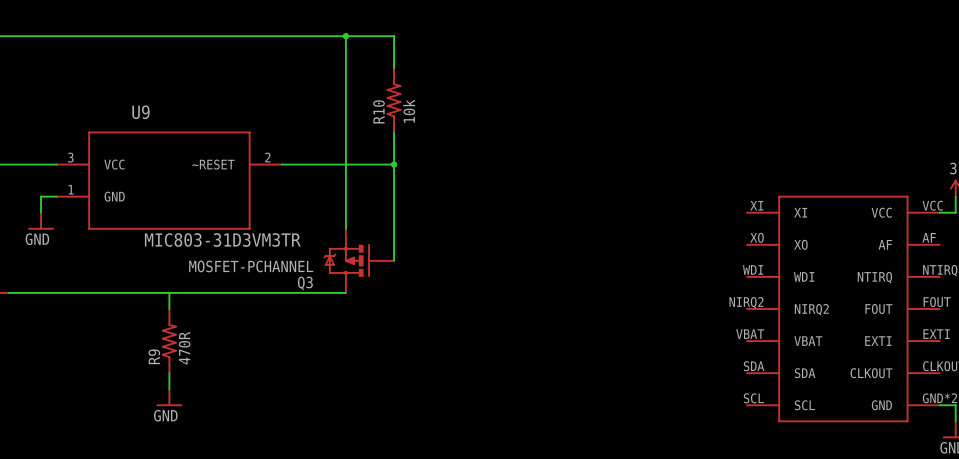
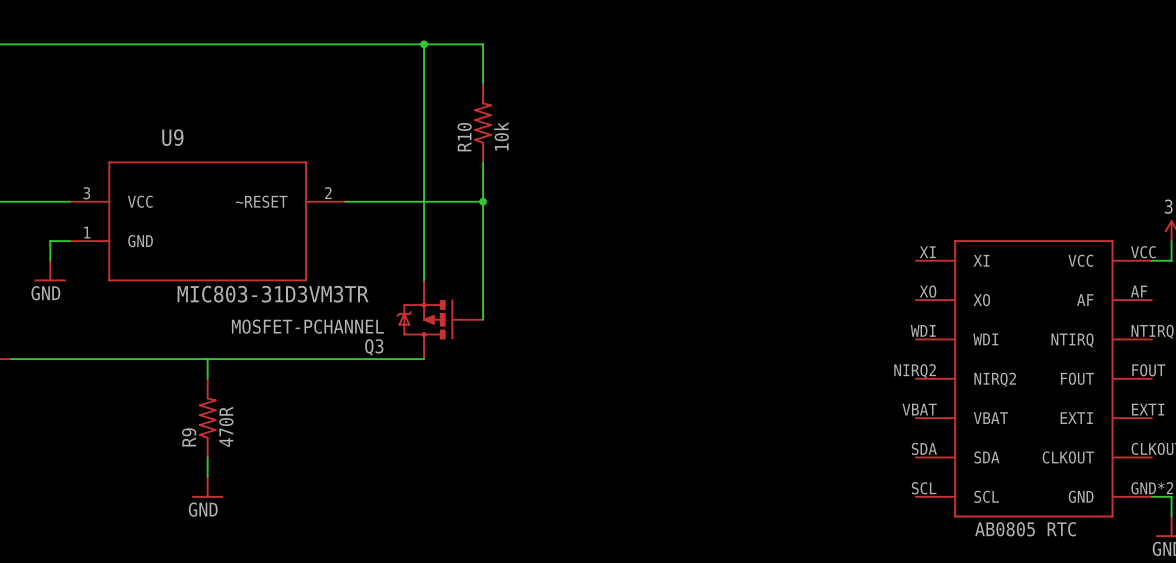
part text: none -> AB0805 RTC (1025, 529)

